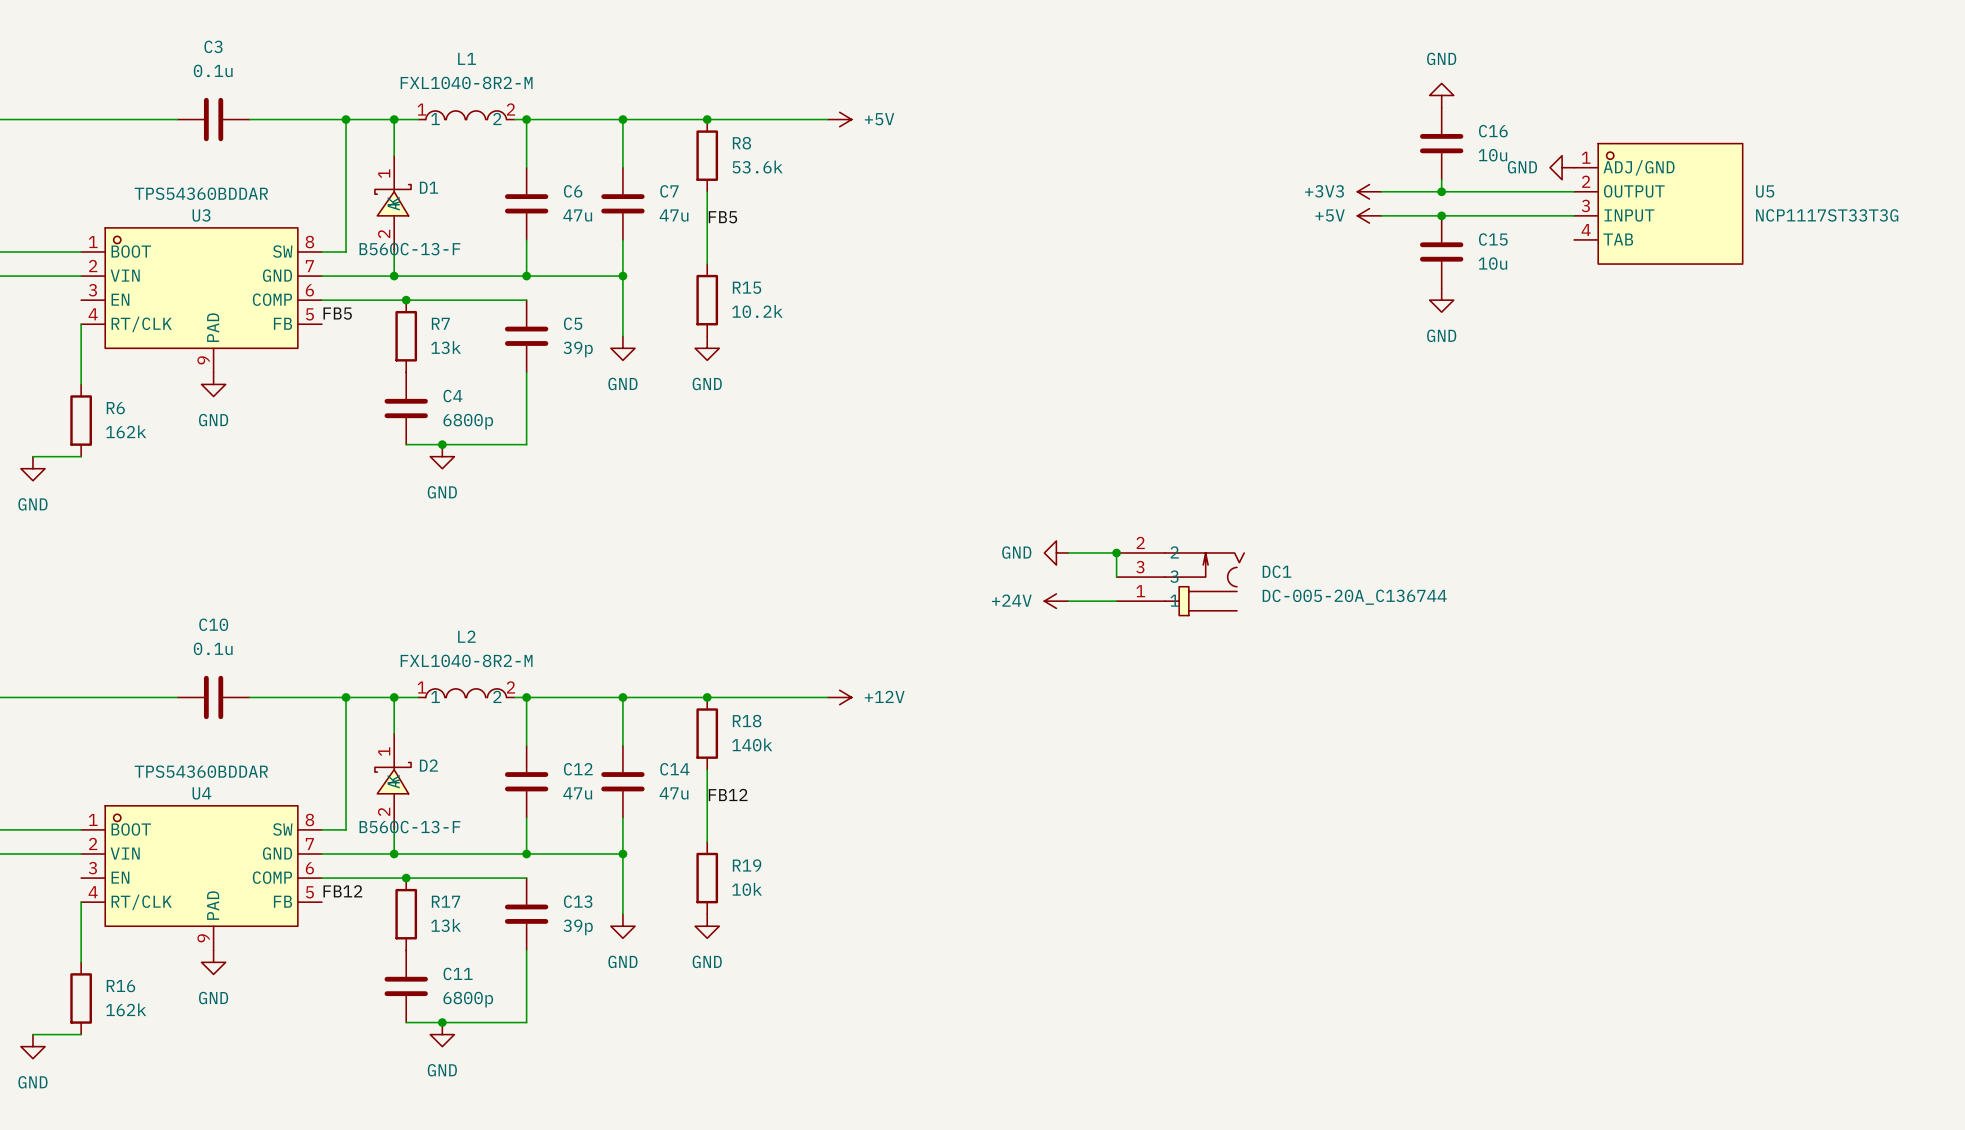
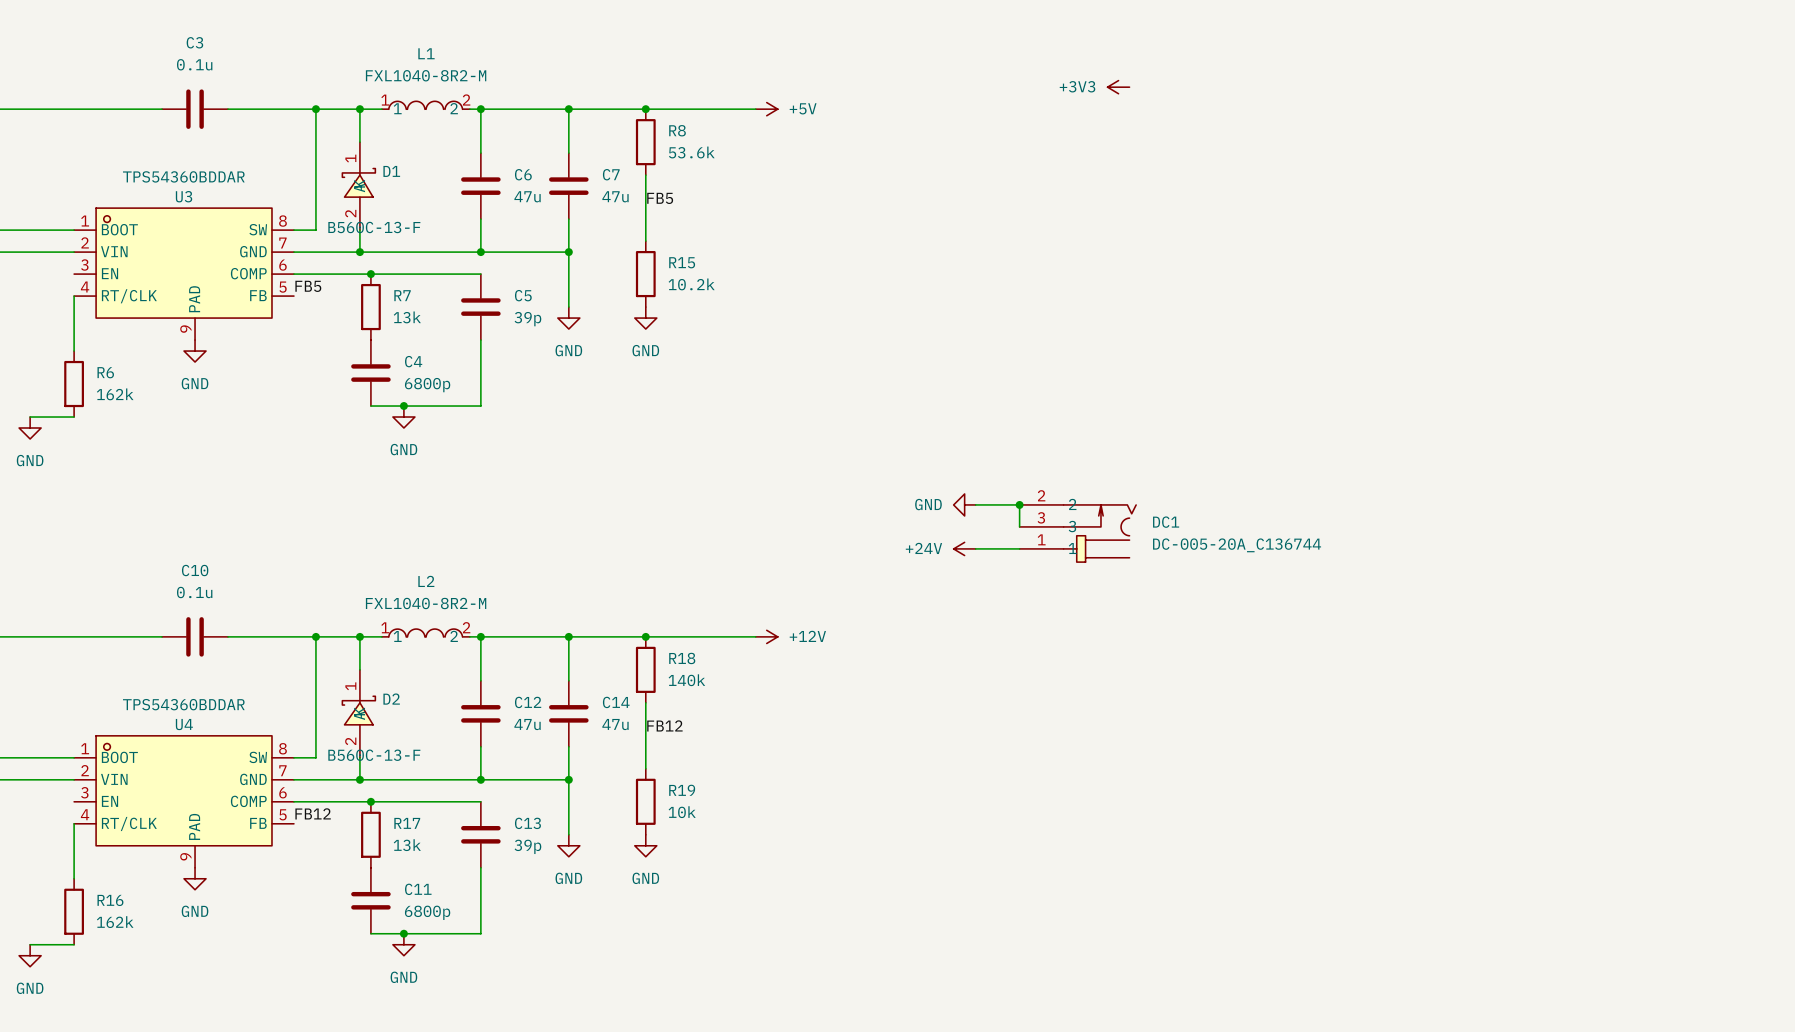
power symbol: GND (1441, 95) -> none
C16: 10u (1441, 143) -> none
power symbol: GND (1562, 167) -> none
wire: (1441, 179) (1441, 191) -> none
power symbol position: +3V3 (1369, 191) -> +3V3 (1118, 87)
wire: (1381, 191) (1574, 191) -> none
junction: (1441, 191) -> none
U5: NCP1117ST33T3G (1658, 203) -> none
power symbol: +5V (1369, 215) -> none
wire: (1381, 215) (1574, 215) -> none
junction: (1441, 215) -> none
C15: 10u (1441, 251) -> none
power symbol: GND (1441, 300) -> none

